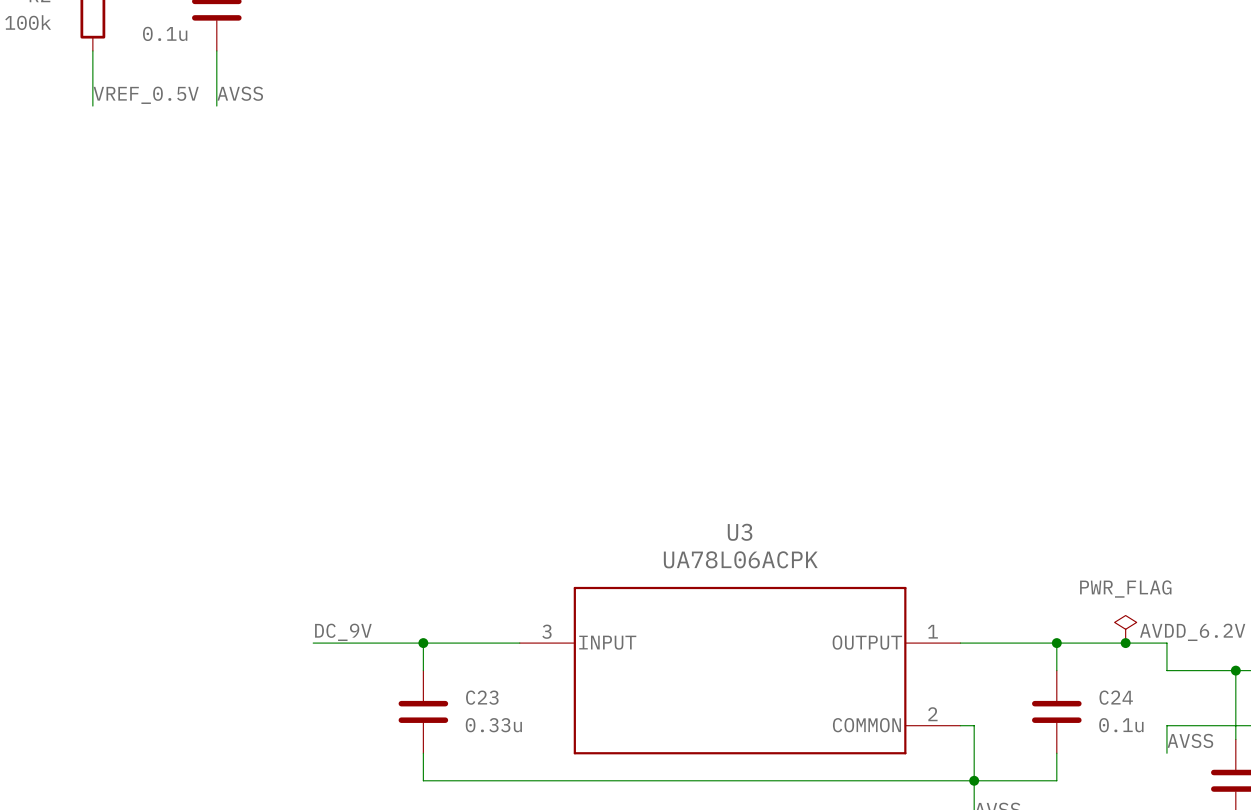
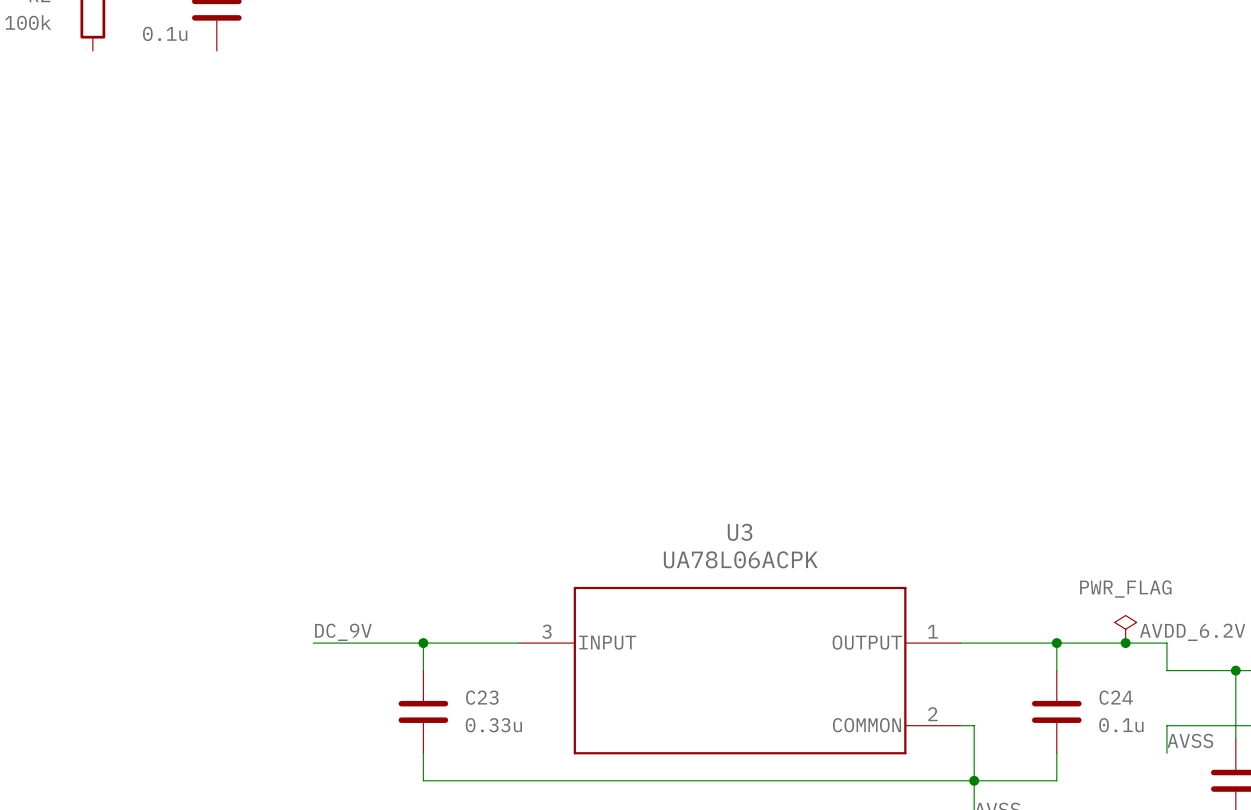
wire: (92, 50) (92, 106) -> none
wire: (216, 50) (216, 106) -> none
label: AVSS (240, 93) -> none
label: VREF_0.5V (146, 95) -> none

